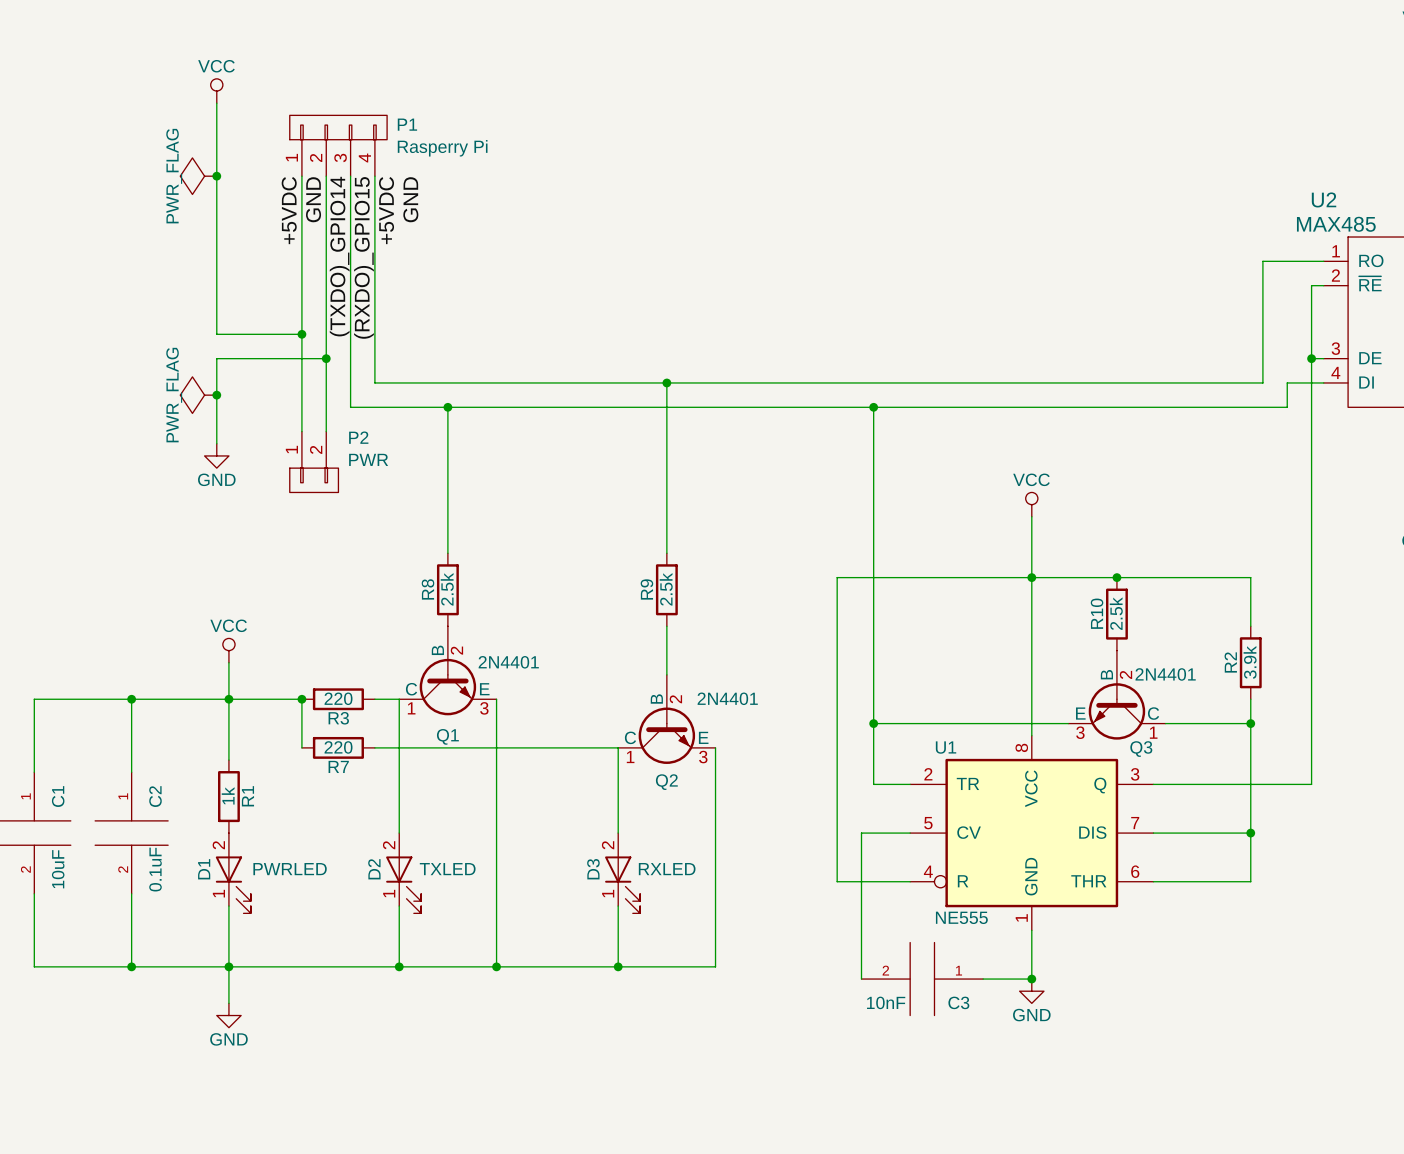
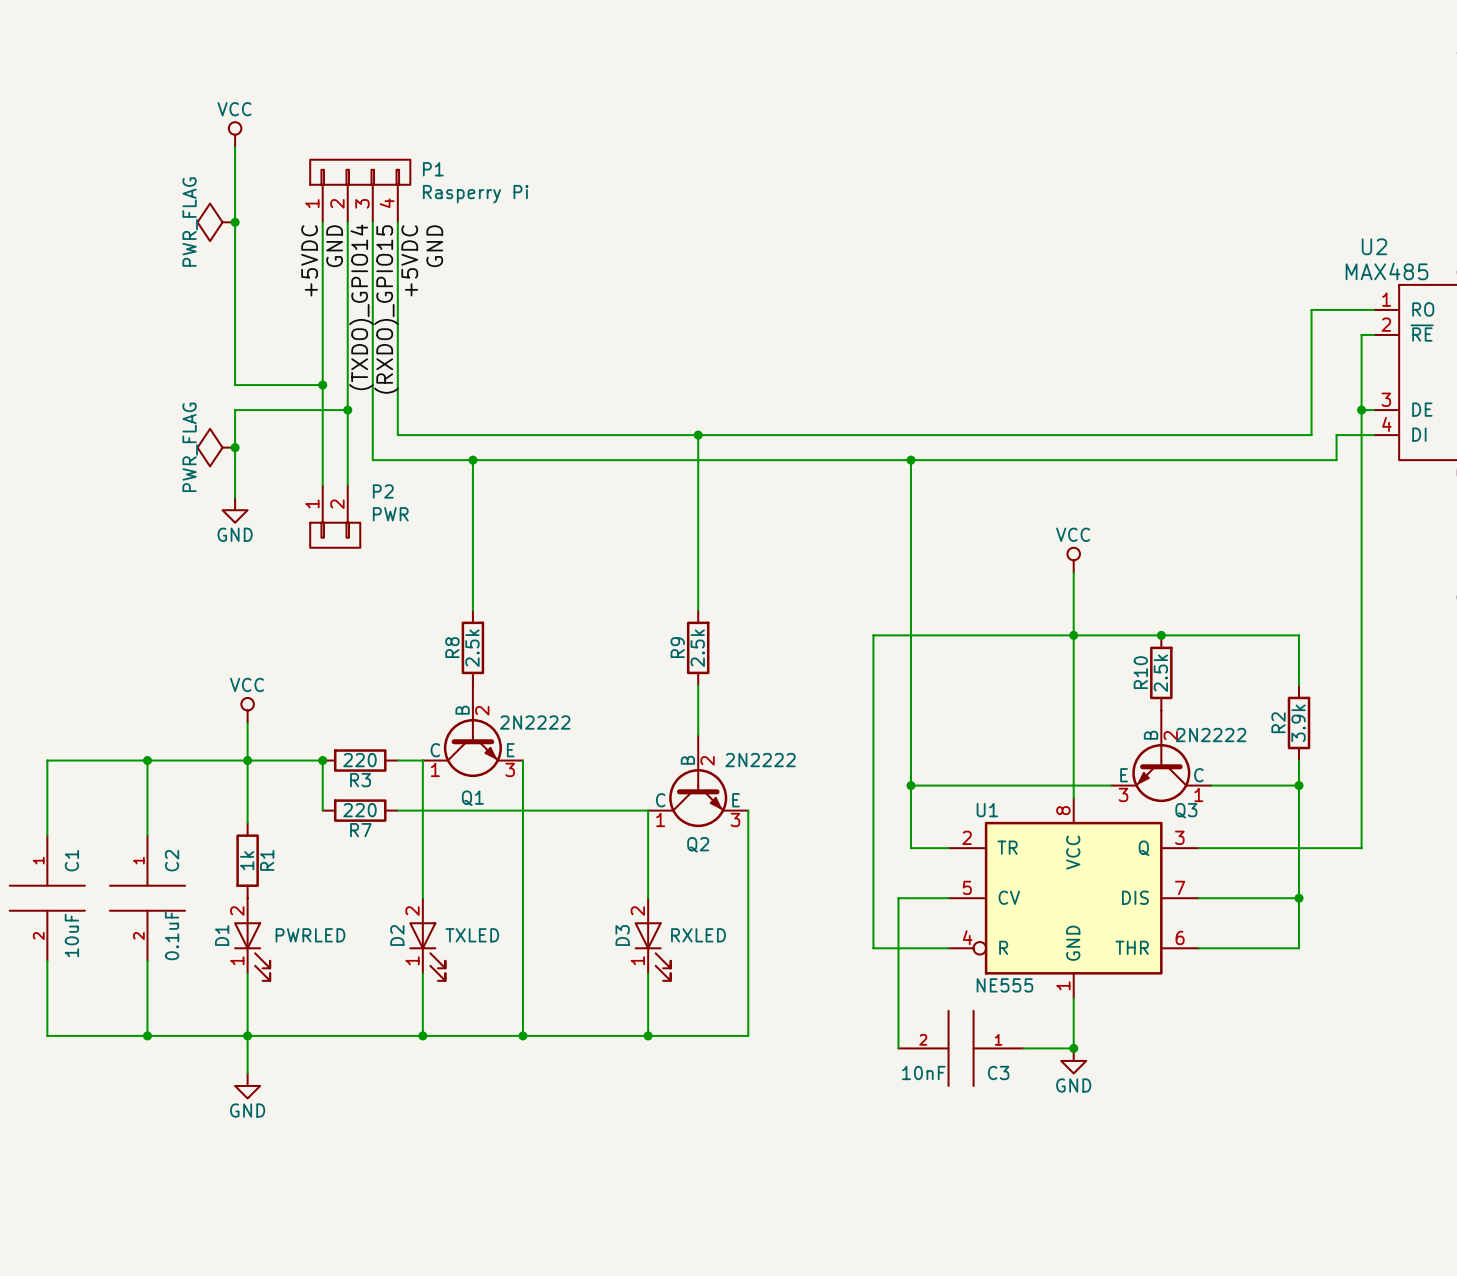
Q1 value: 2N4401 (508, 662) -> 2N2222 (535, 722)
Q3 value: 2N4401 (1165, 674) -> 2N2222 (1211, 735)
Q2 value: 2N4401 (727, 698) -> 2N2222 (760, 760)

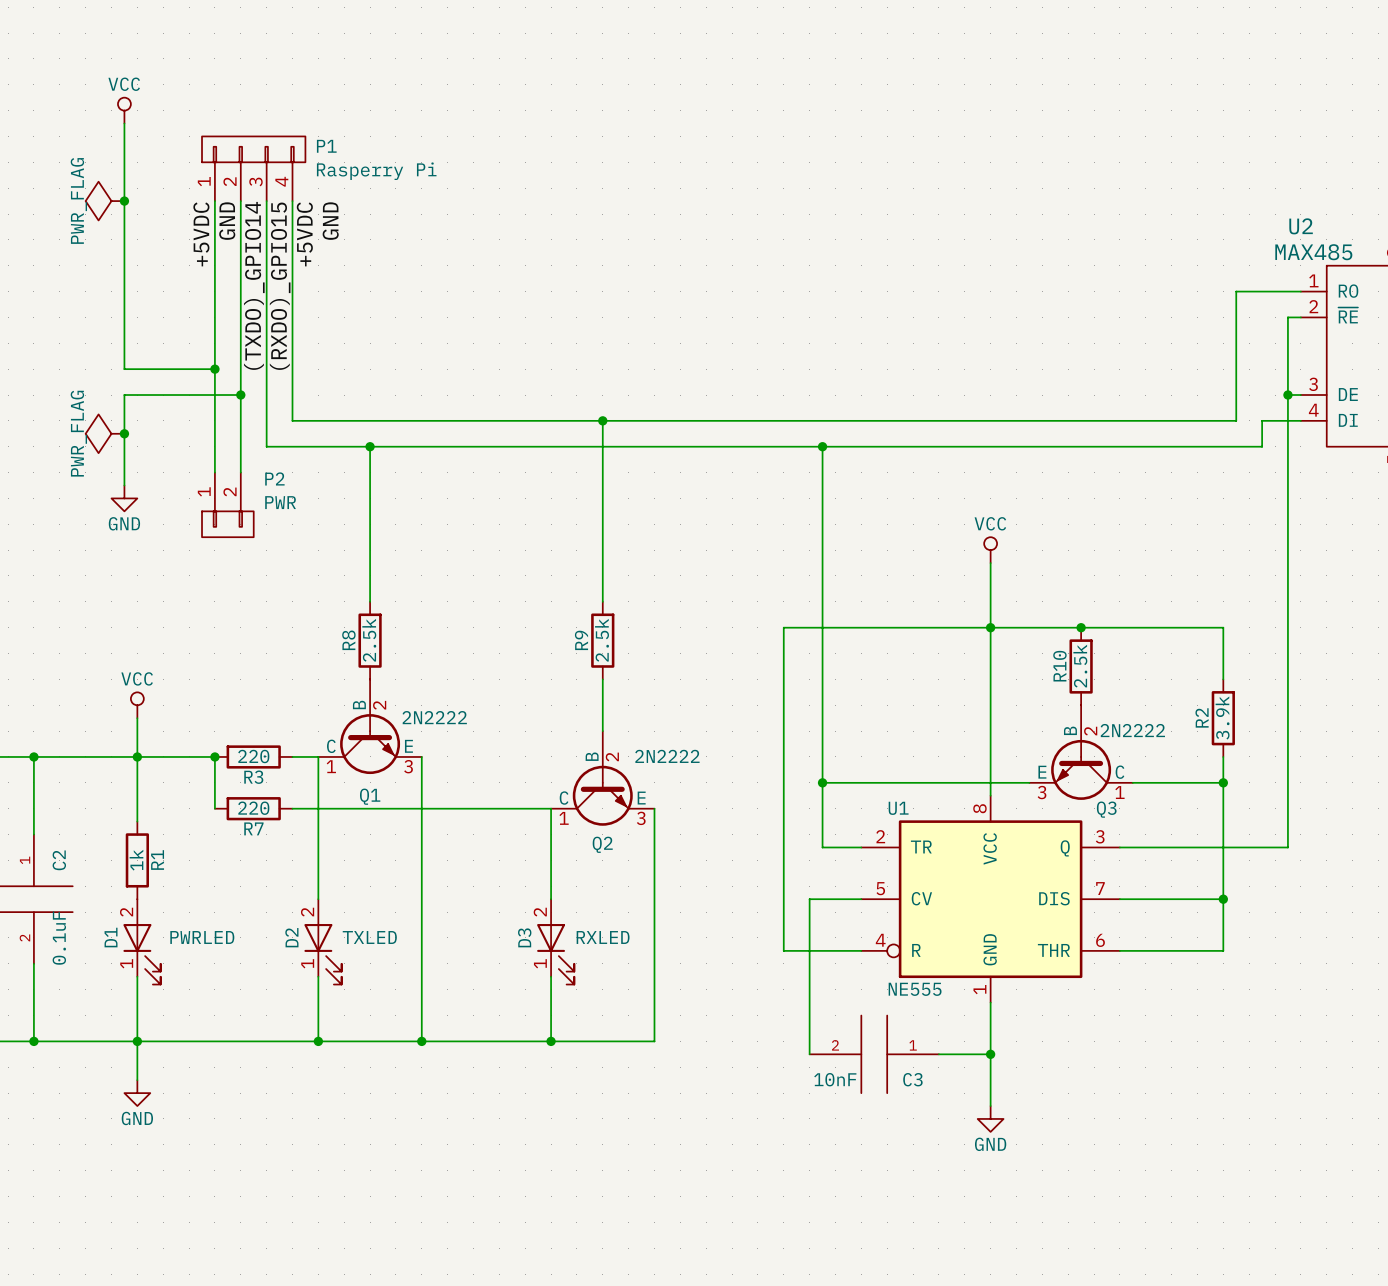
wire: none -> (990, 1054) (990, 1106)
power symbol position: GND (1073, 1060) -> GND (990, 1118)

